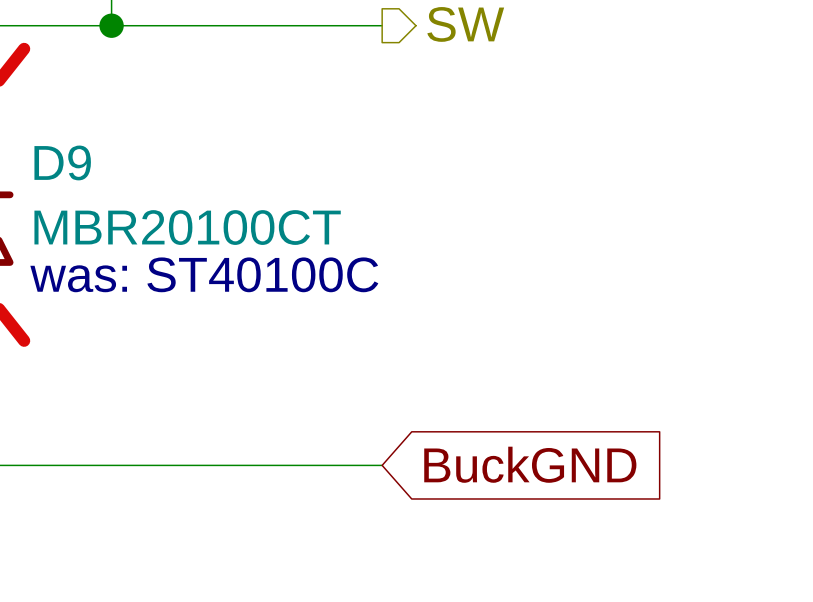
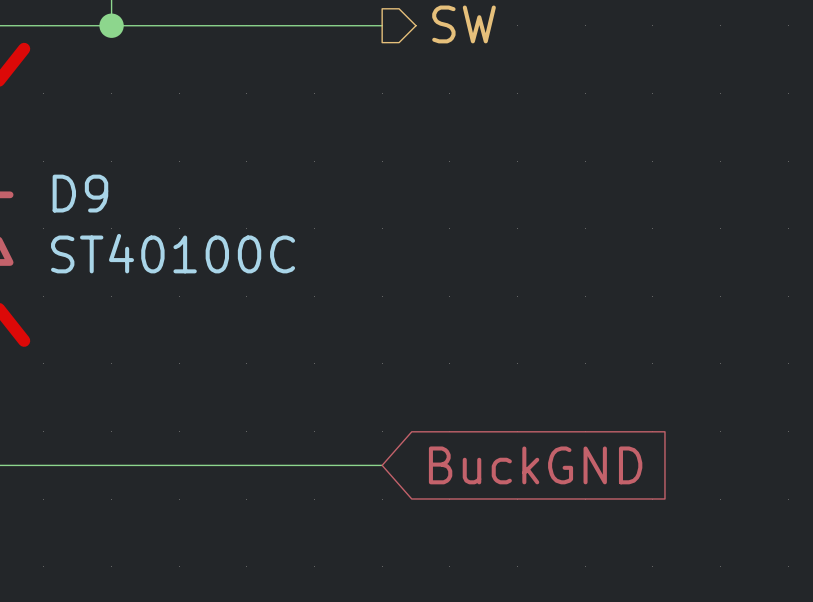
D9 name position: D9 (62, 162) -> D9 (80, 193)
D9 value: MBR20100CT (187, 227) -> ST40100C (173, 253)
text: was: ST40100C (204, 274) -> none

